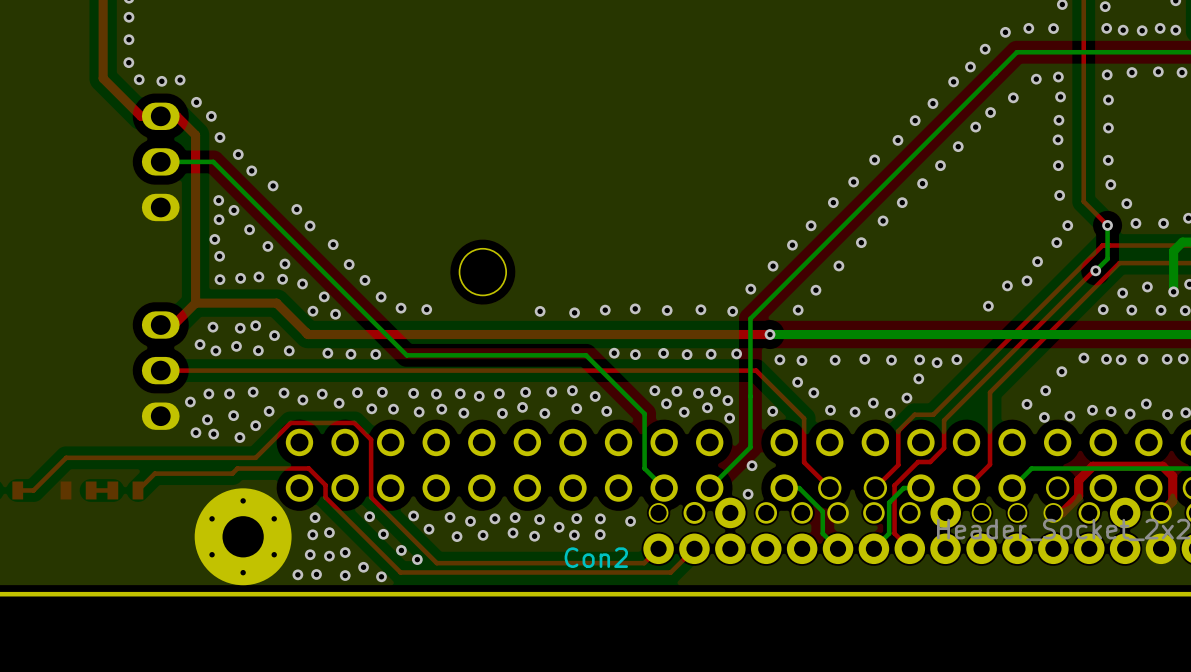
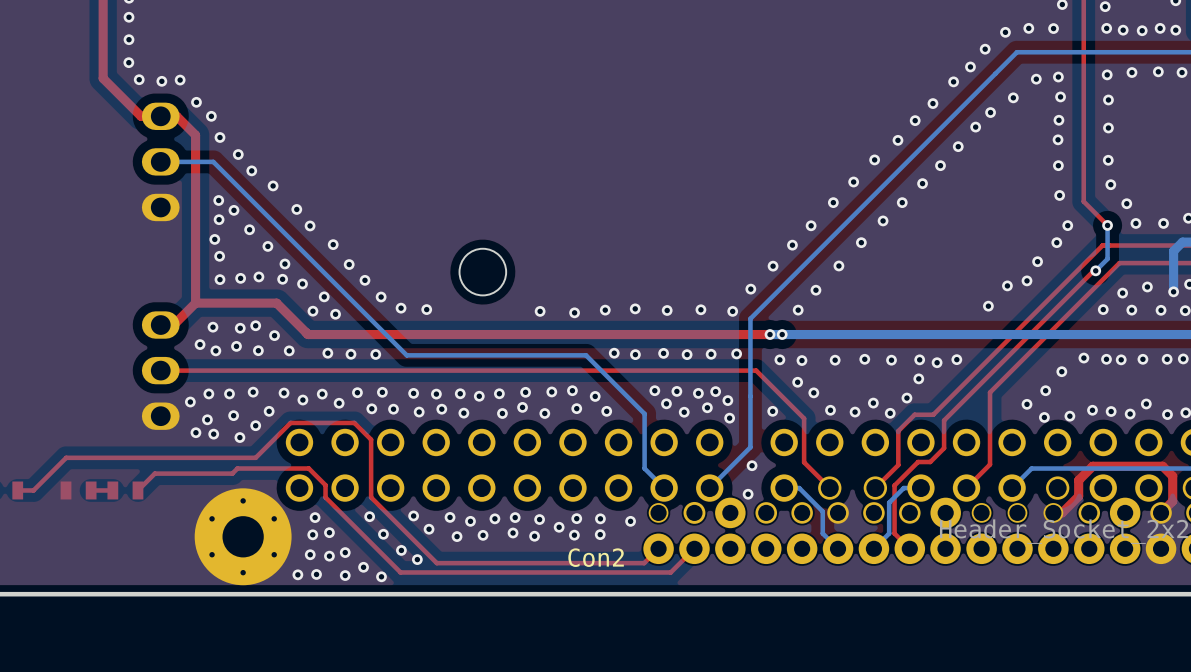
via: none -> (782, 334)

